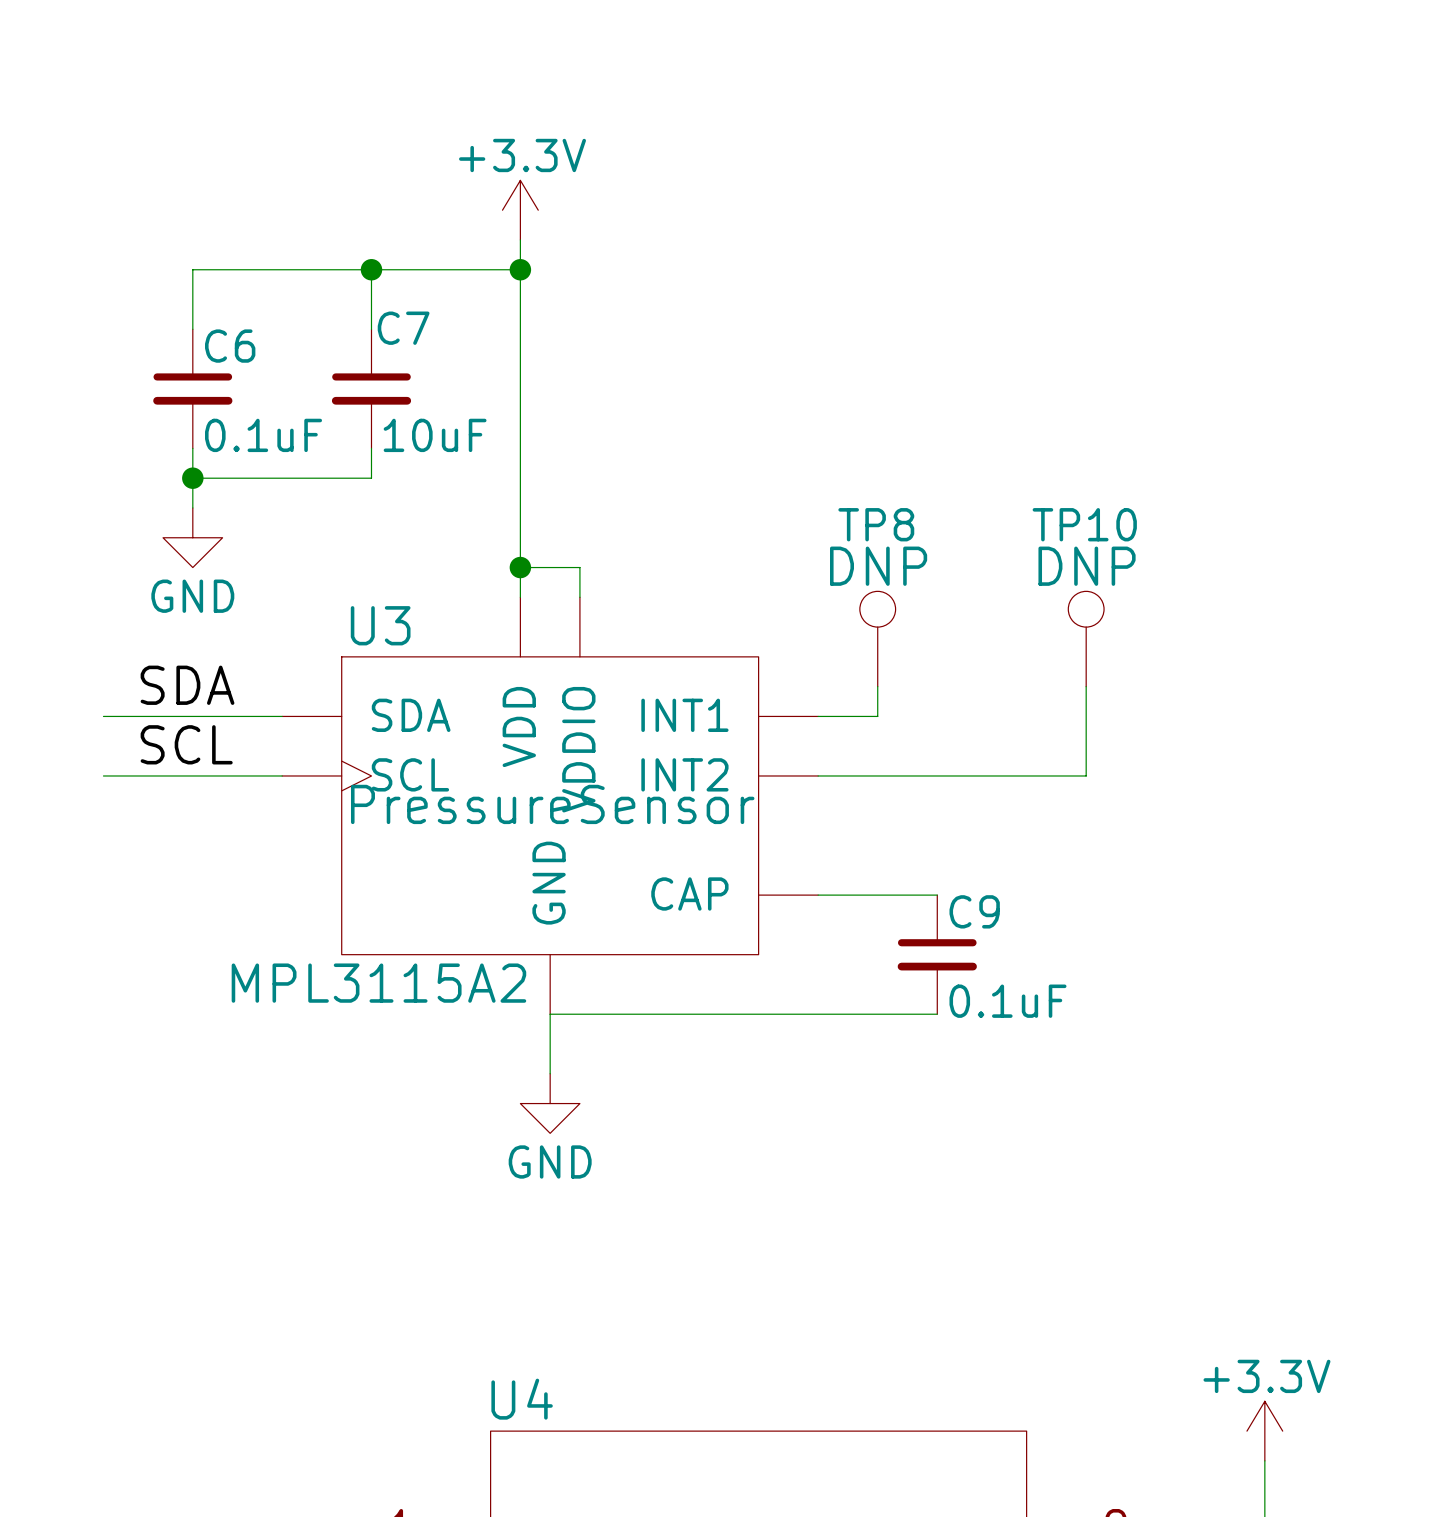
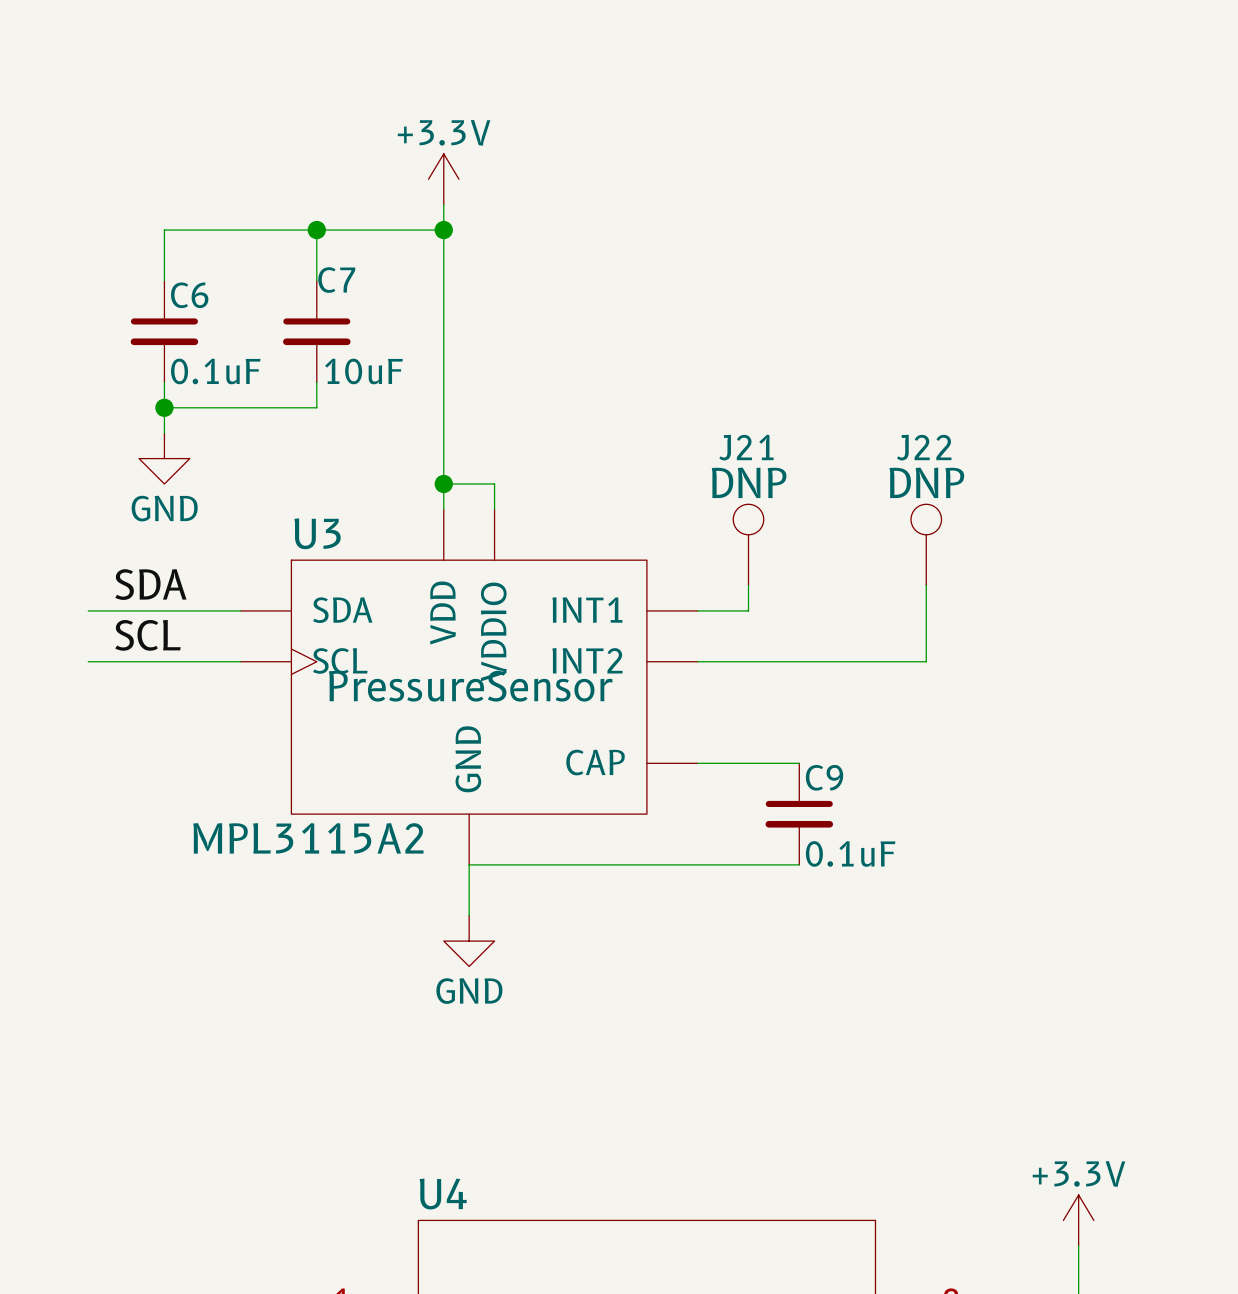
TP8 name: TP8 (876, 524) -> J21 (746, 447)
TP10 name: TP10 (1084, 524) -> J22 (924, 447)

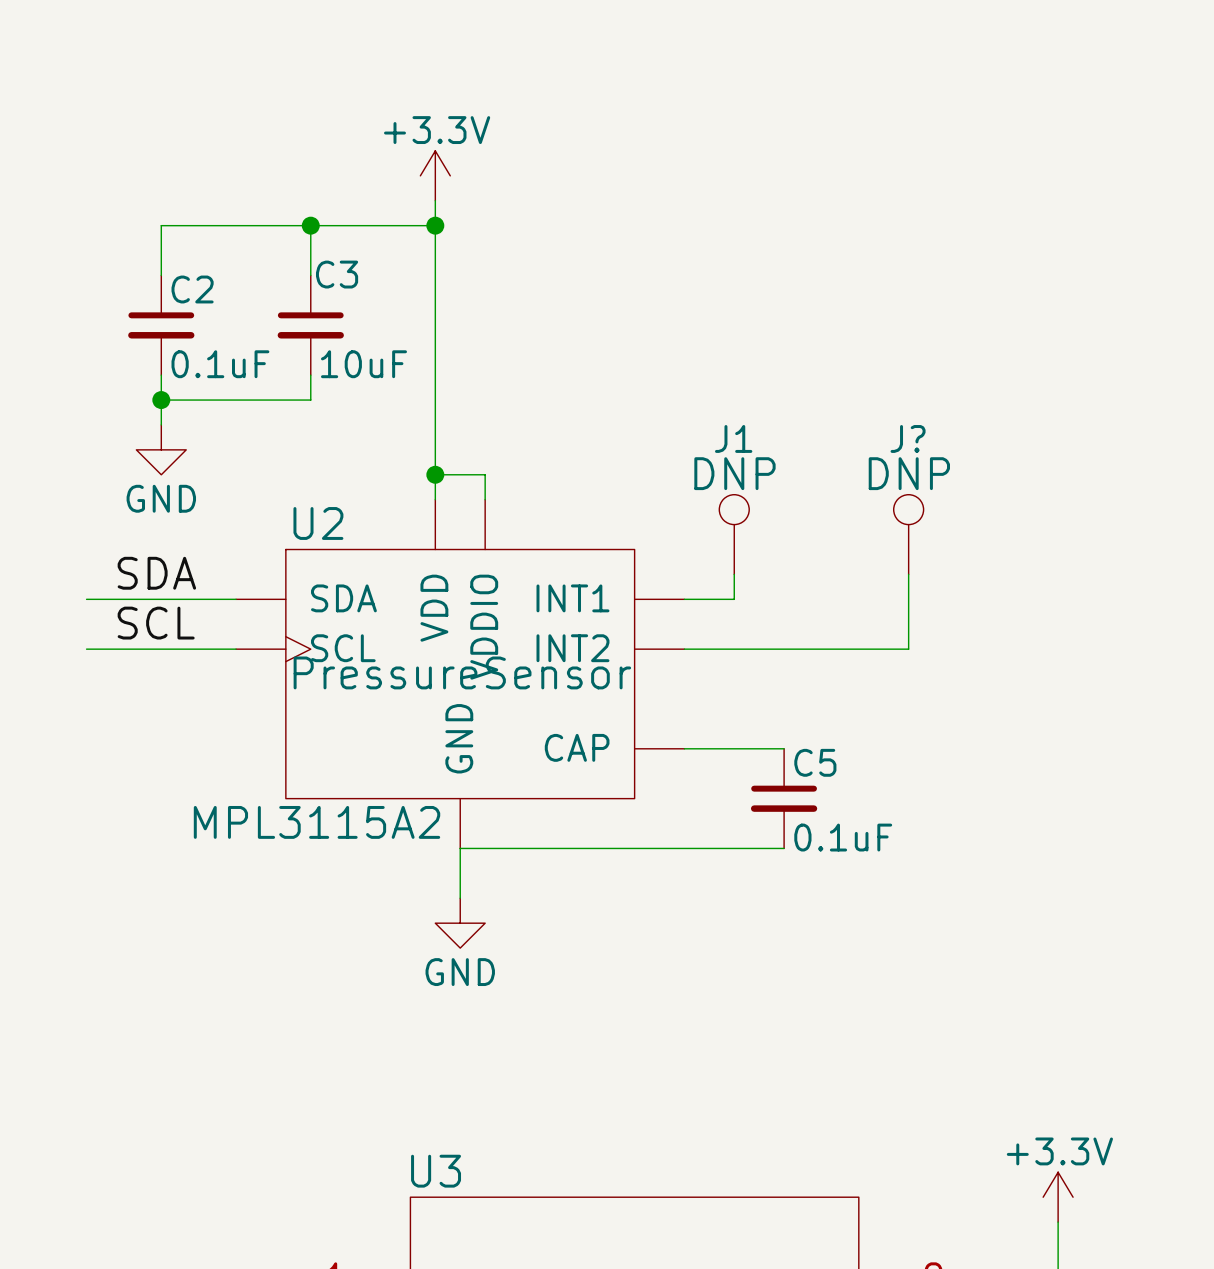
C7 name: C7 (336, 280) -> C3 (337, 274)
C6 name: C6 (189, 295) -> C2 (192, 289)
J21 name: J21 (746, 447) -> J1 (733, 438)
J22 name: J22 (924, 447) -> J? (908, 438)
U3 name: U3 (317, 533) -> U2 (318, 523)
C9 name: C9 (824, 777) -> C5 (815, 762)
U4 name: U4 (443, 1194) -> U3 (436, 1171)

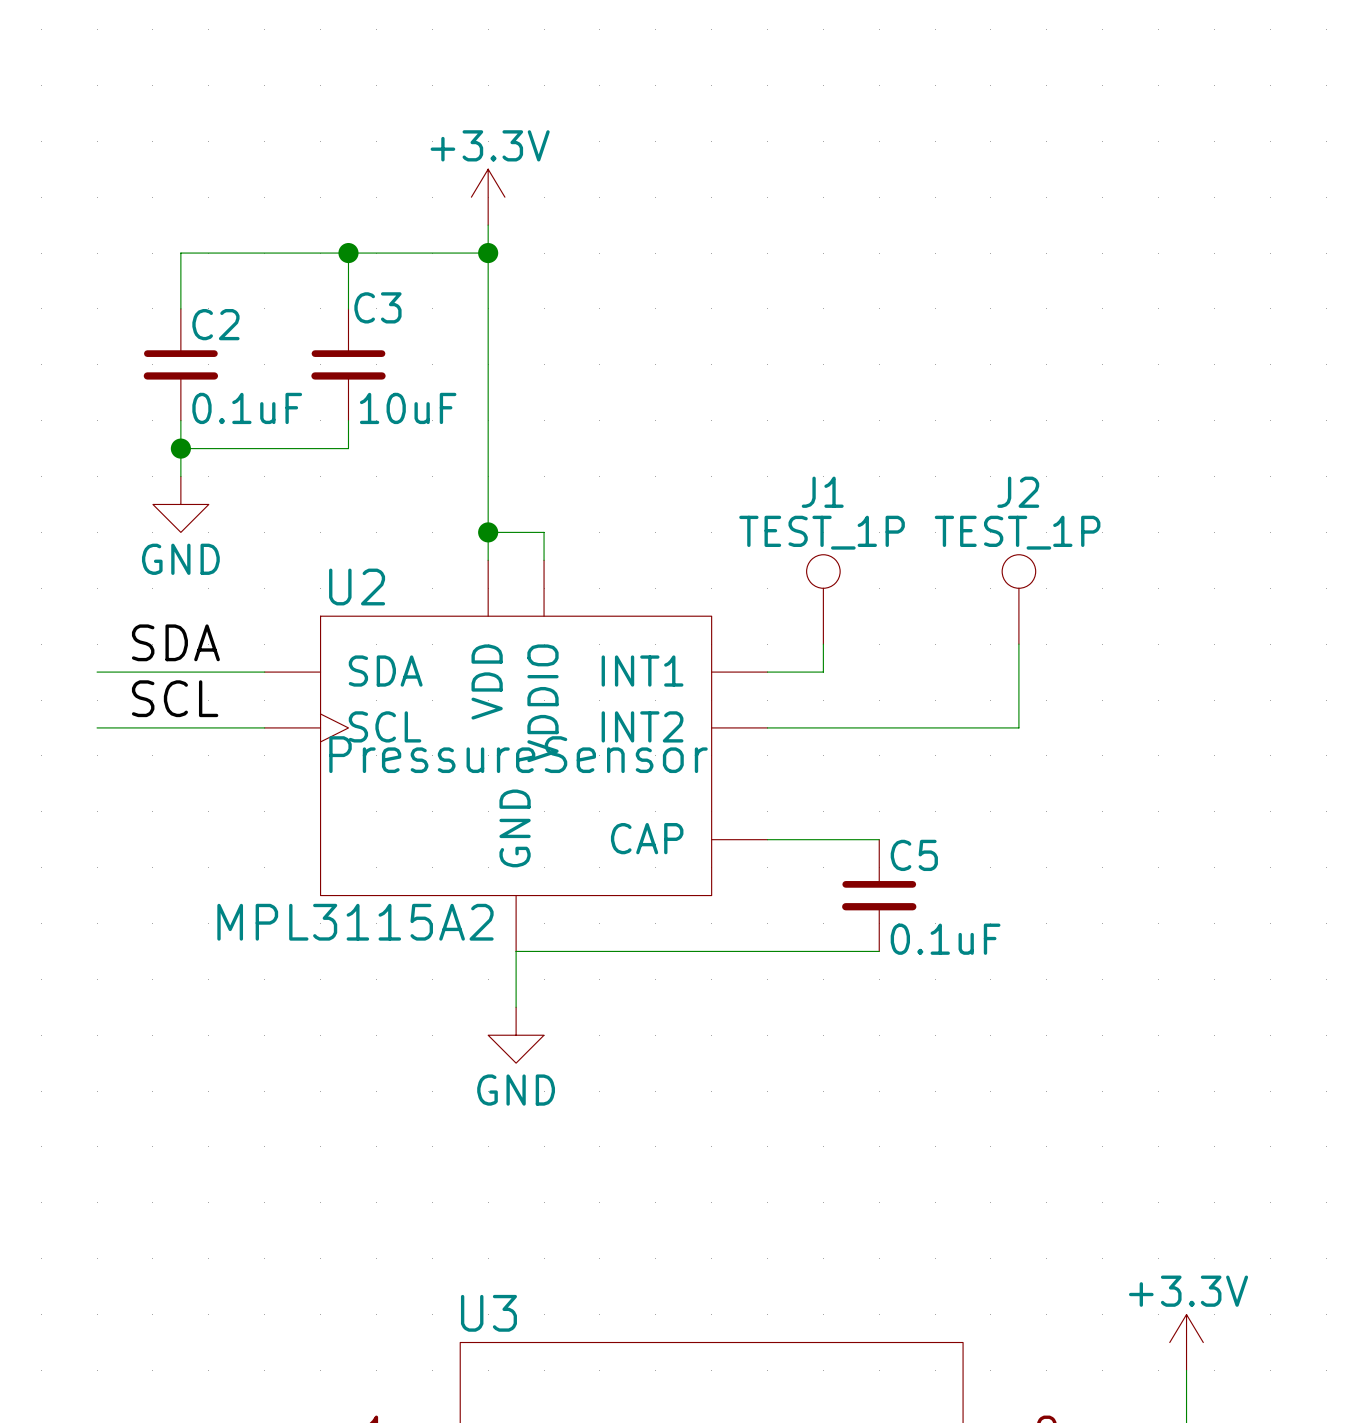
J? name: J? (908, 438) -> J2 (1018, 492)
J1 text: DNP (734, 473) -> none
J? text: DNP (909, 473) -> none
J1 value: none -> TEST_1P (822, 532)
J? value: none -> TEST_1P (1017, 532)

